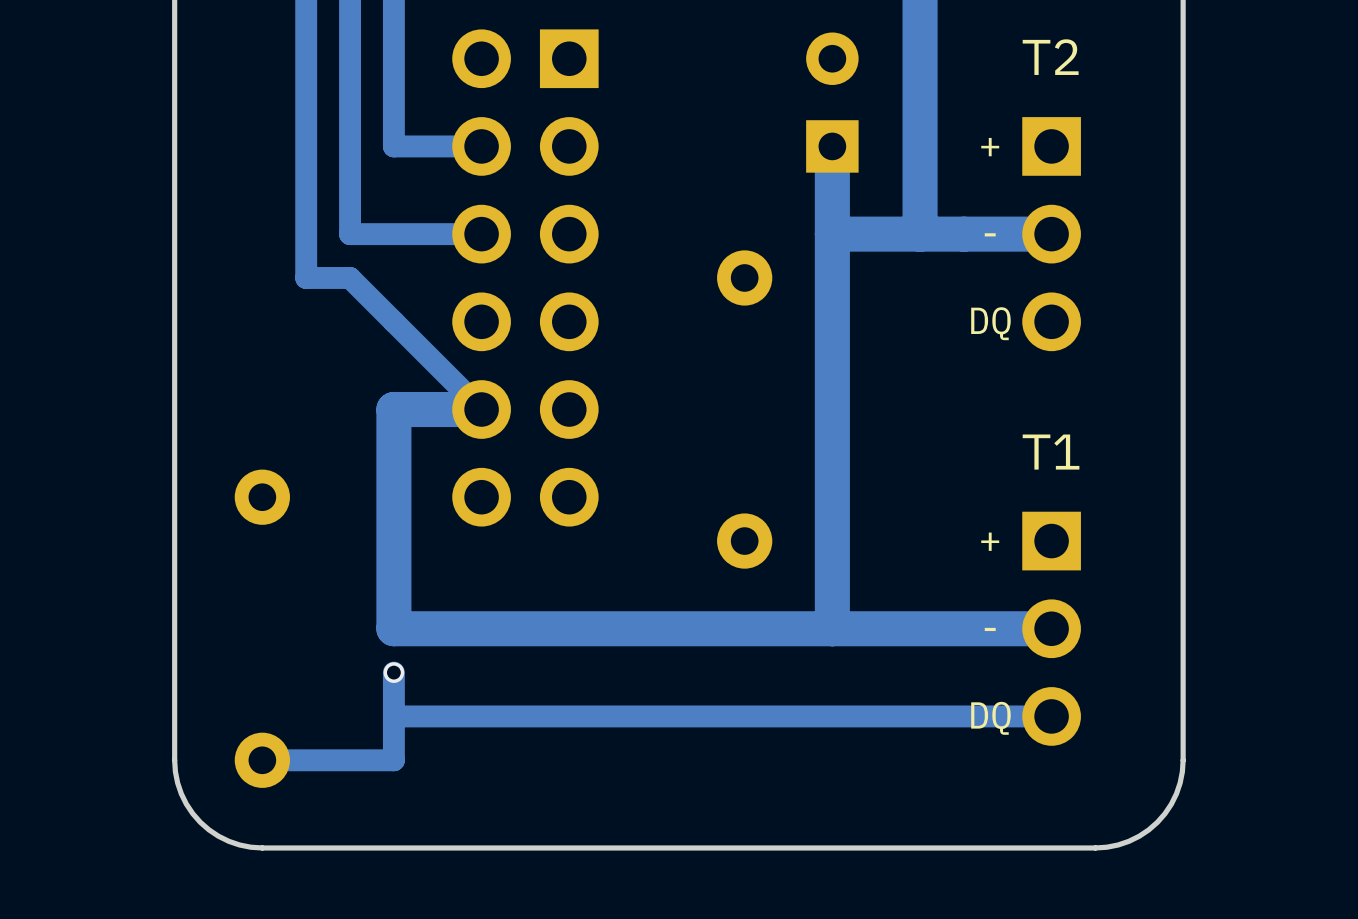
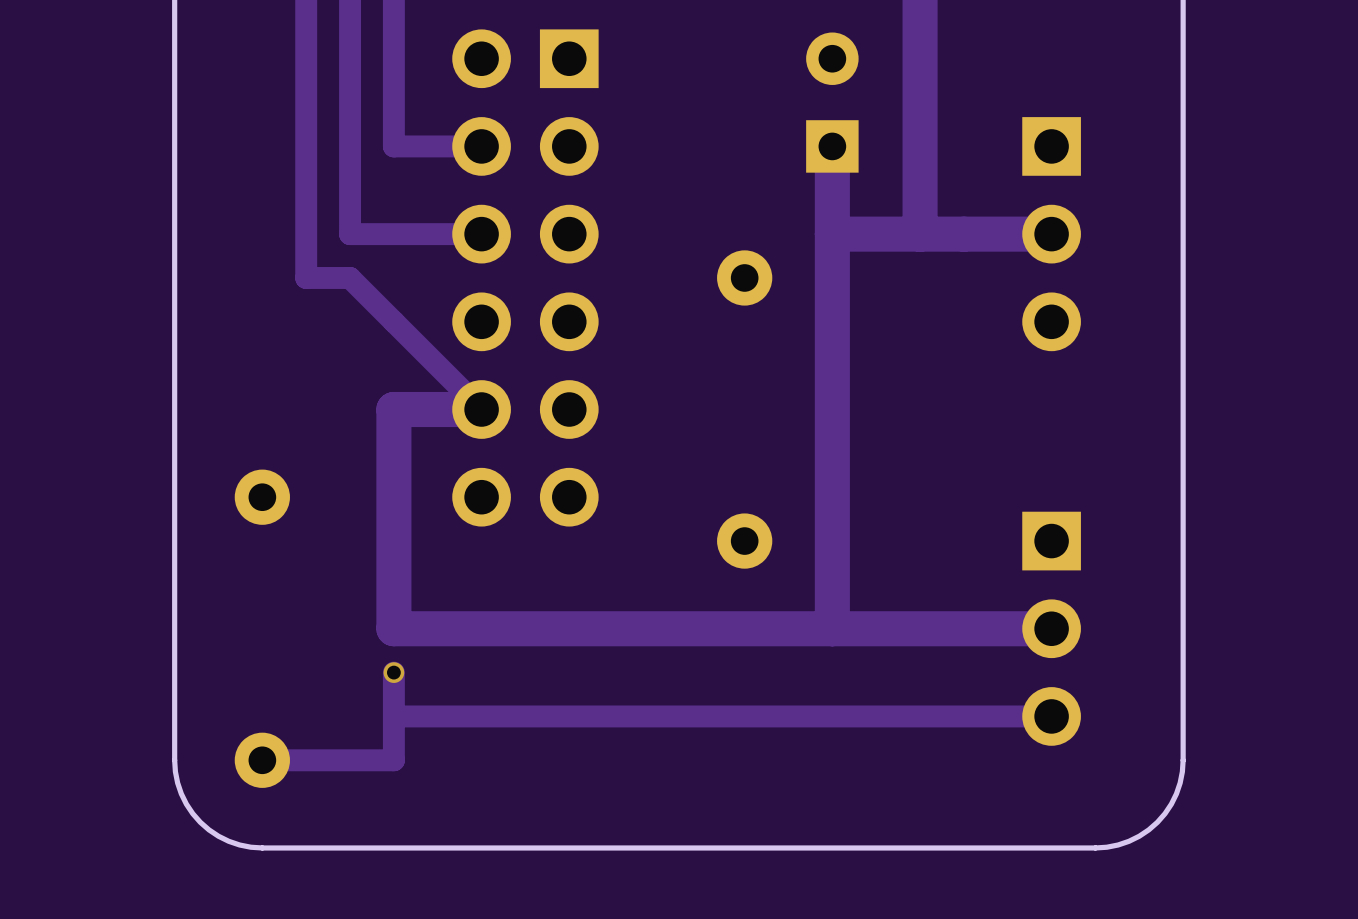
text: T2 (1050, 57) -> none
text: + (990, 147) -> none
text: - (990, 234) -> none
text: DQ (990, 323) -> none
text: T1 (1051, 452) -> none
text: + (990, 541) -> none
text: - (990, 629) -> none
text: DQ (990, 718) -> none

